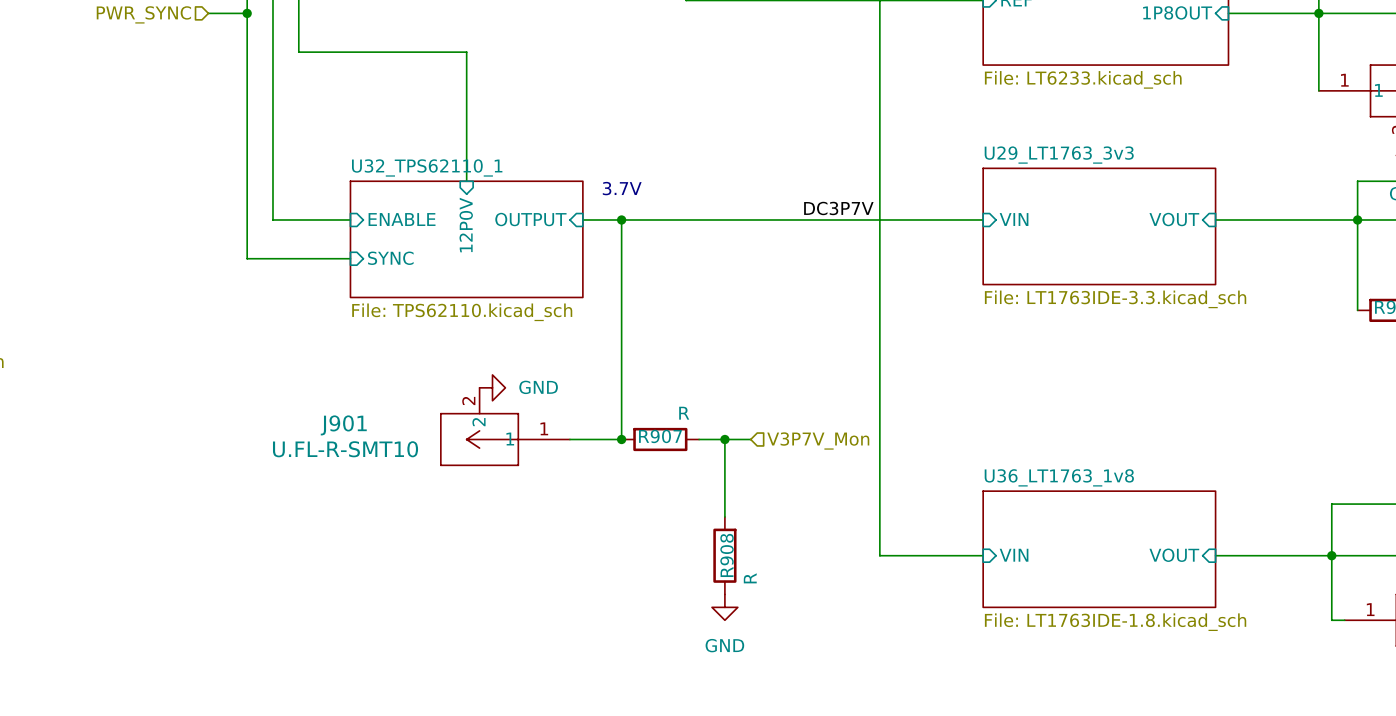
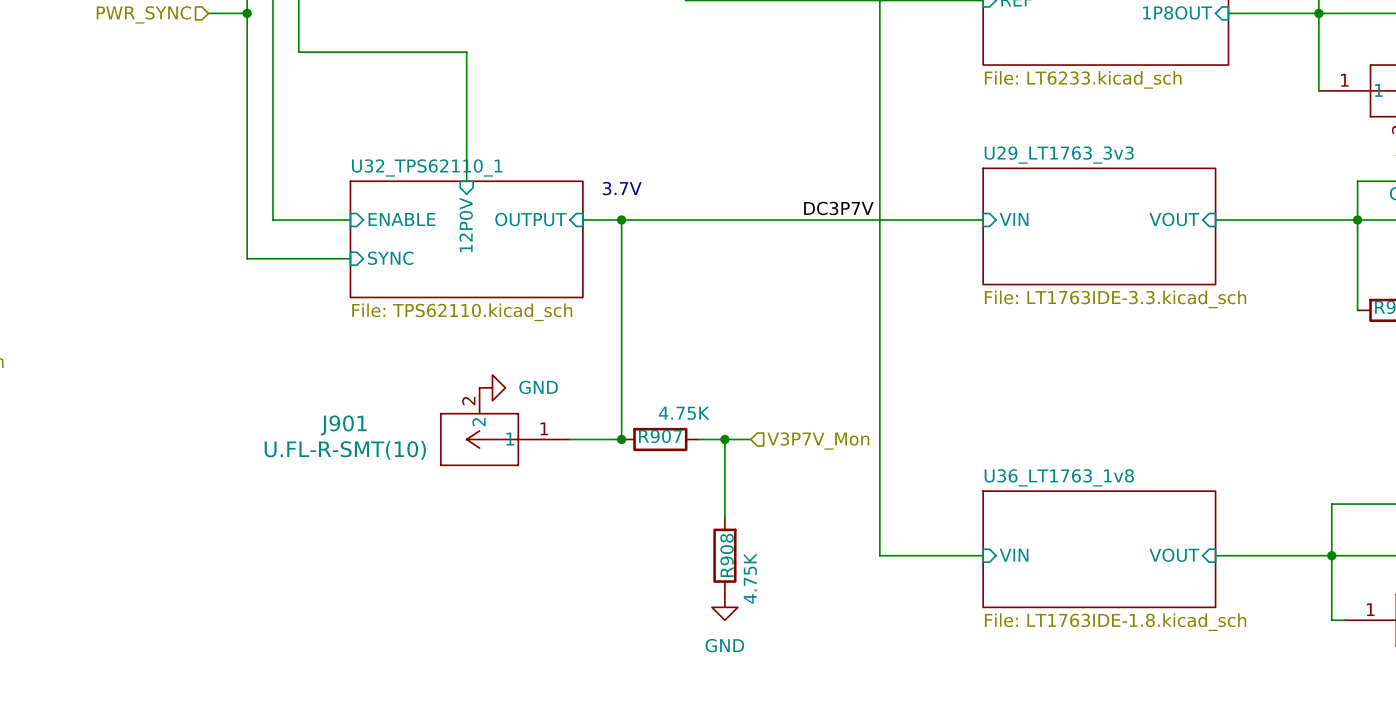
R907 value: R (684, 413) -> 4.75K (684, 413)
J901 value: U.FL-R-SMT10 (345, 449) -> U.FL-R-SMT(10) (345, 450)
R908 value: R (750, 578) -> 4.75K (750, 578)

